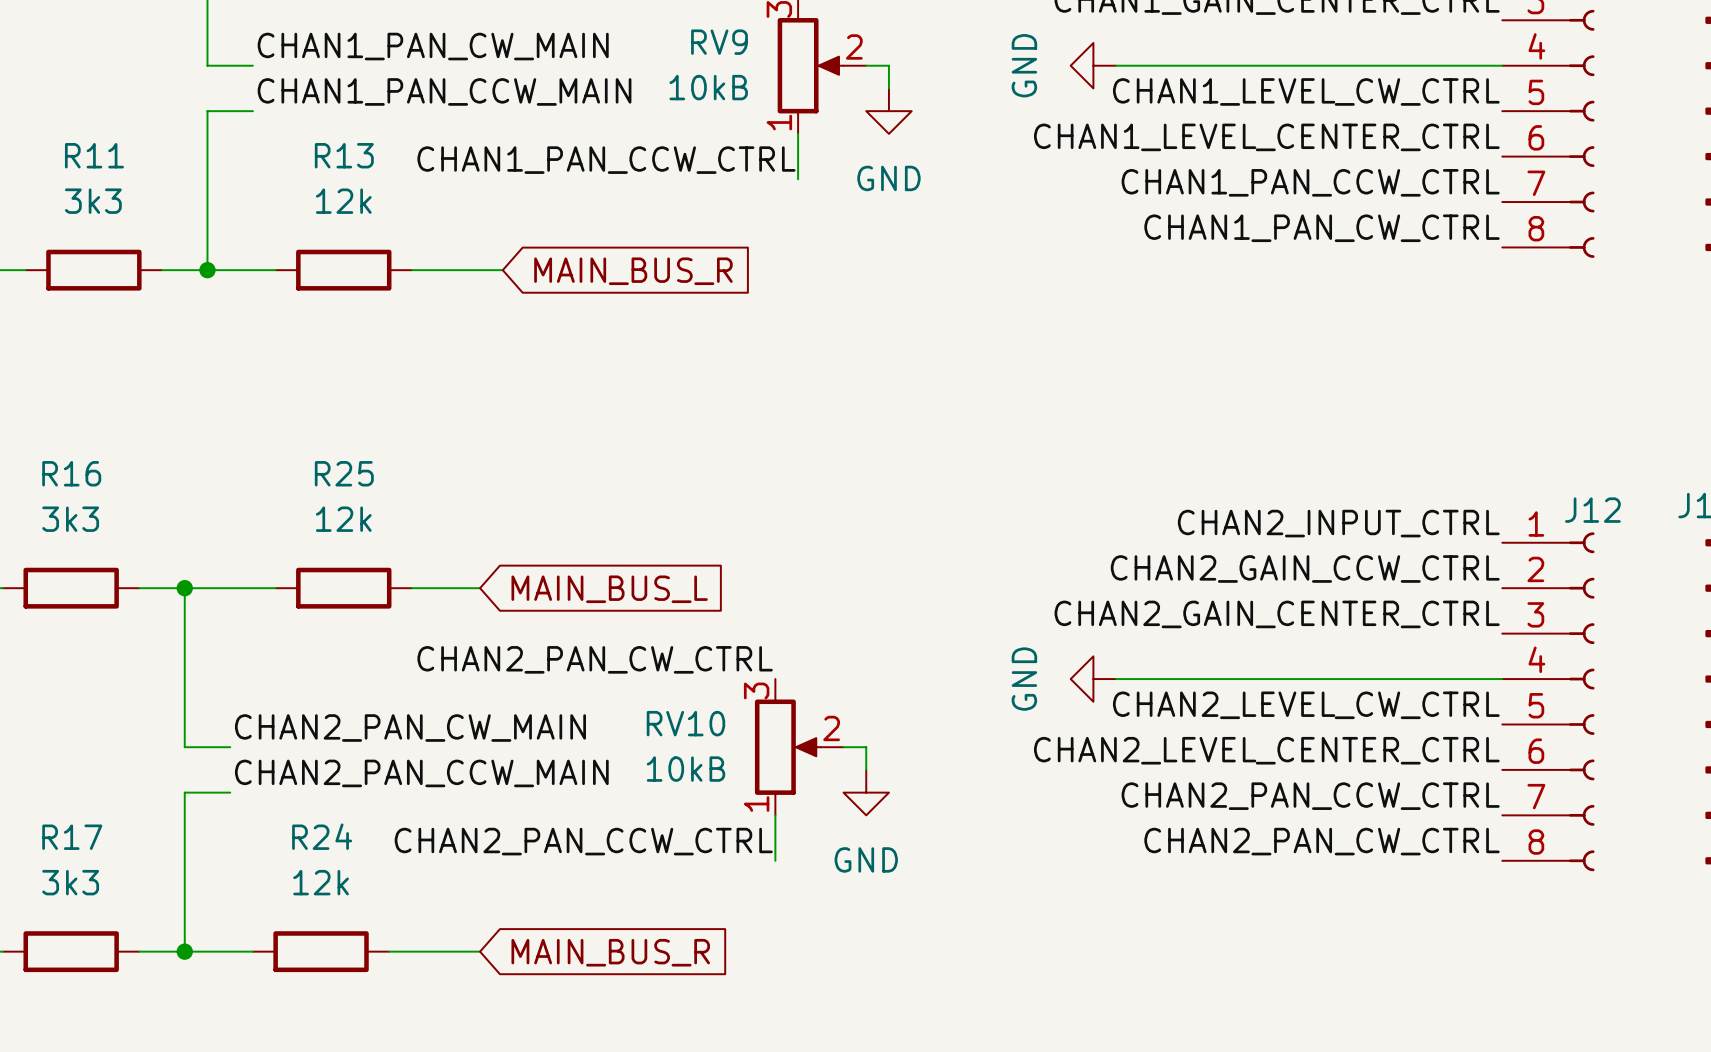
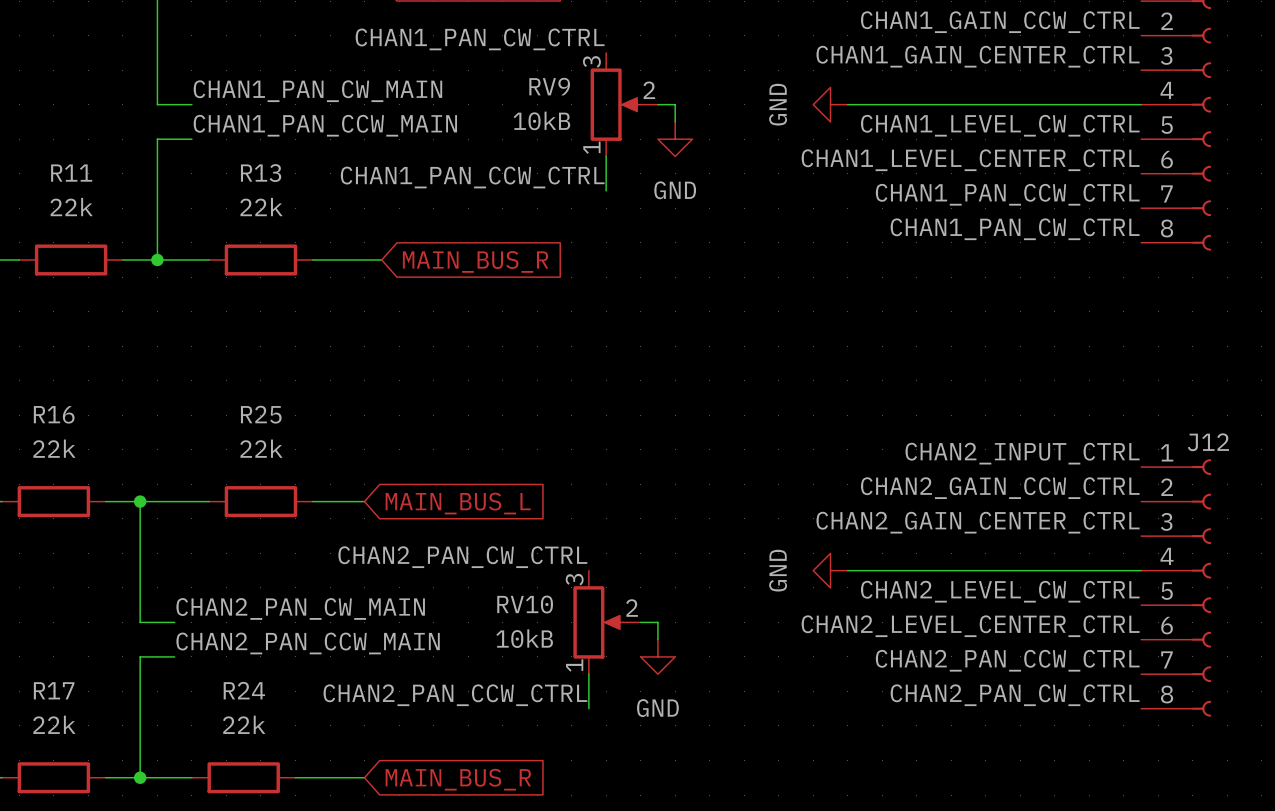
R11 value: 3k3 (93, 201) -> 22k (71, 207)
R13 value: 12k (343, 201) -> 22k (261, 207)
R16 value: 3k3 (70, 519) -> 22k (54, 448)
R25 value: 12k (343, 519) -> 22k (261, 448)
R17 value: 3k3 (70, 882) -> 22k (54, 724)
R24 value: 12k (321, 882) -> 22k (244, 724)

